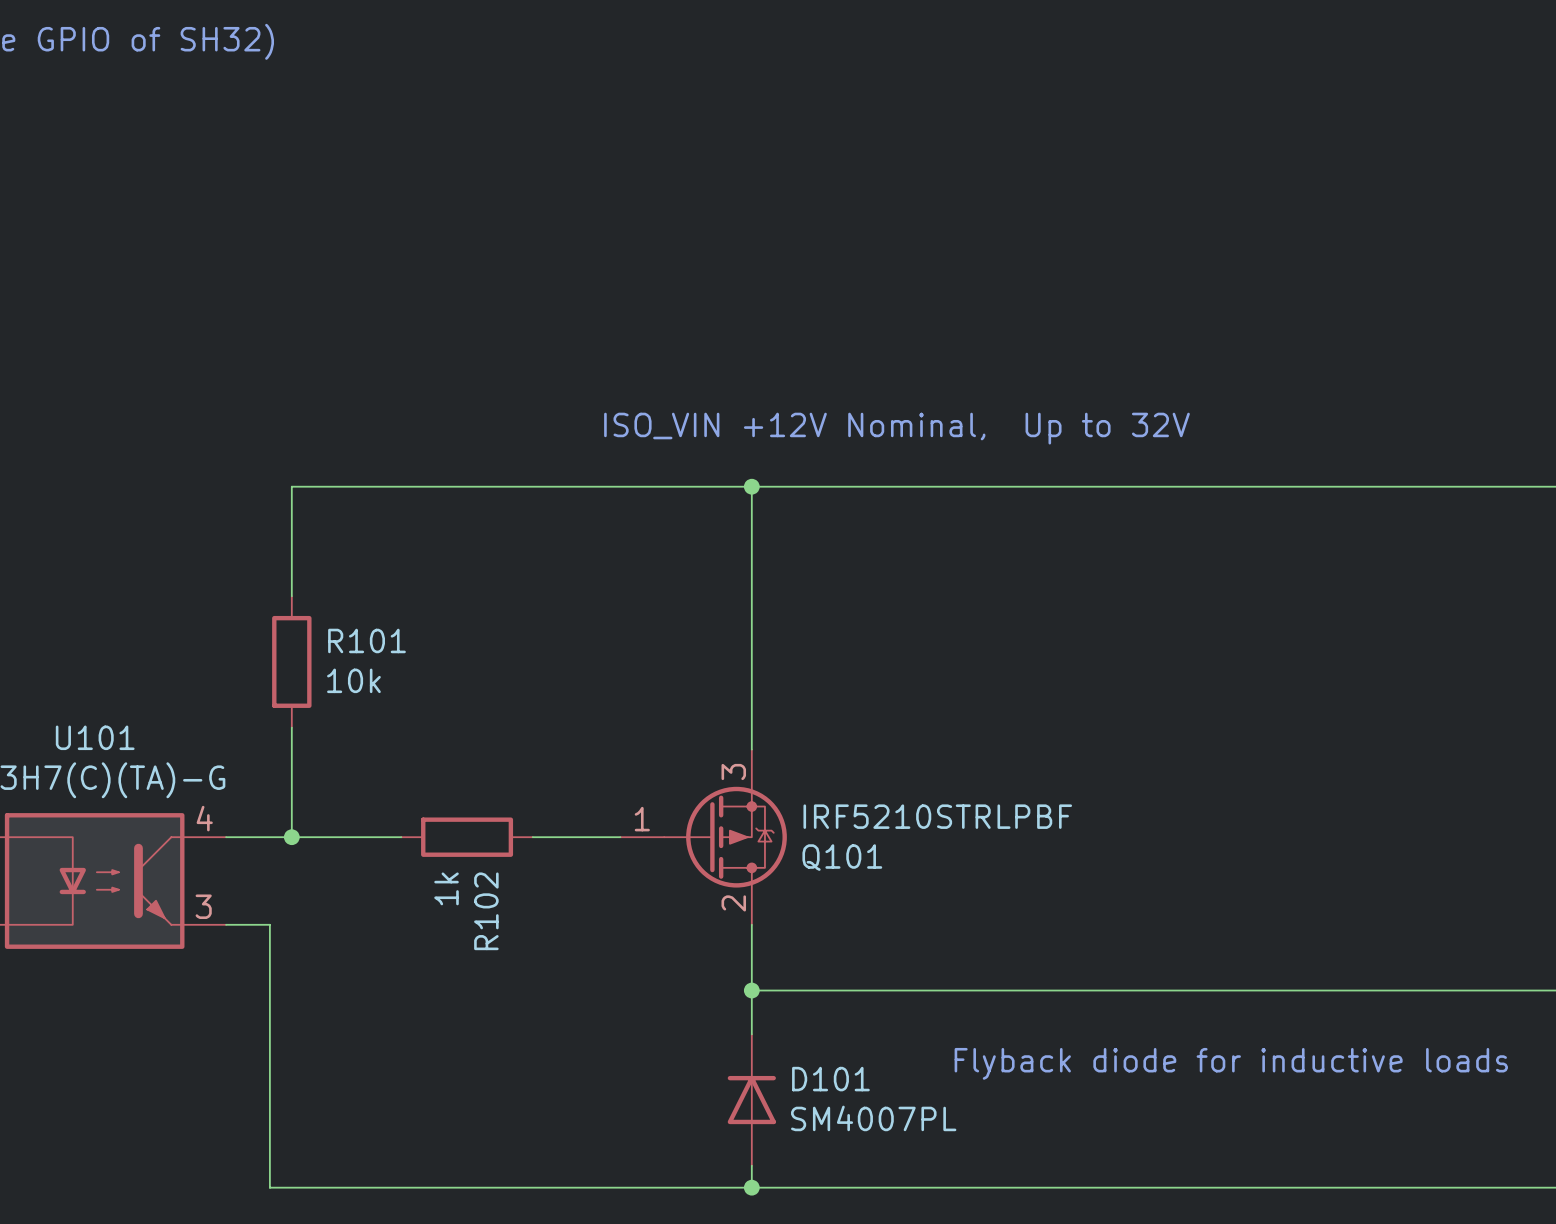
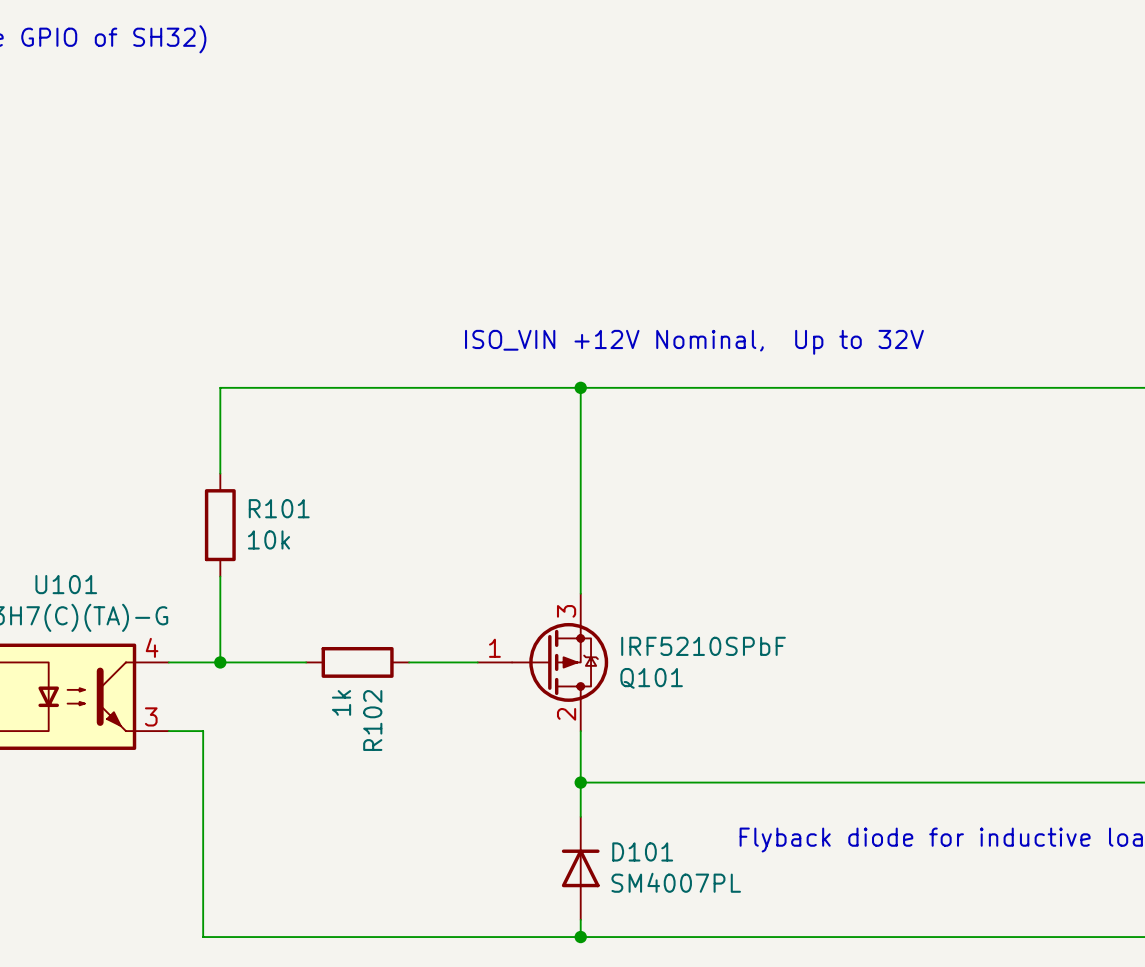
Q101 value: IRF5210STRLPBF (937, 816) -> IRF5210SPbF (703, 646)

